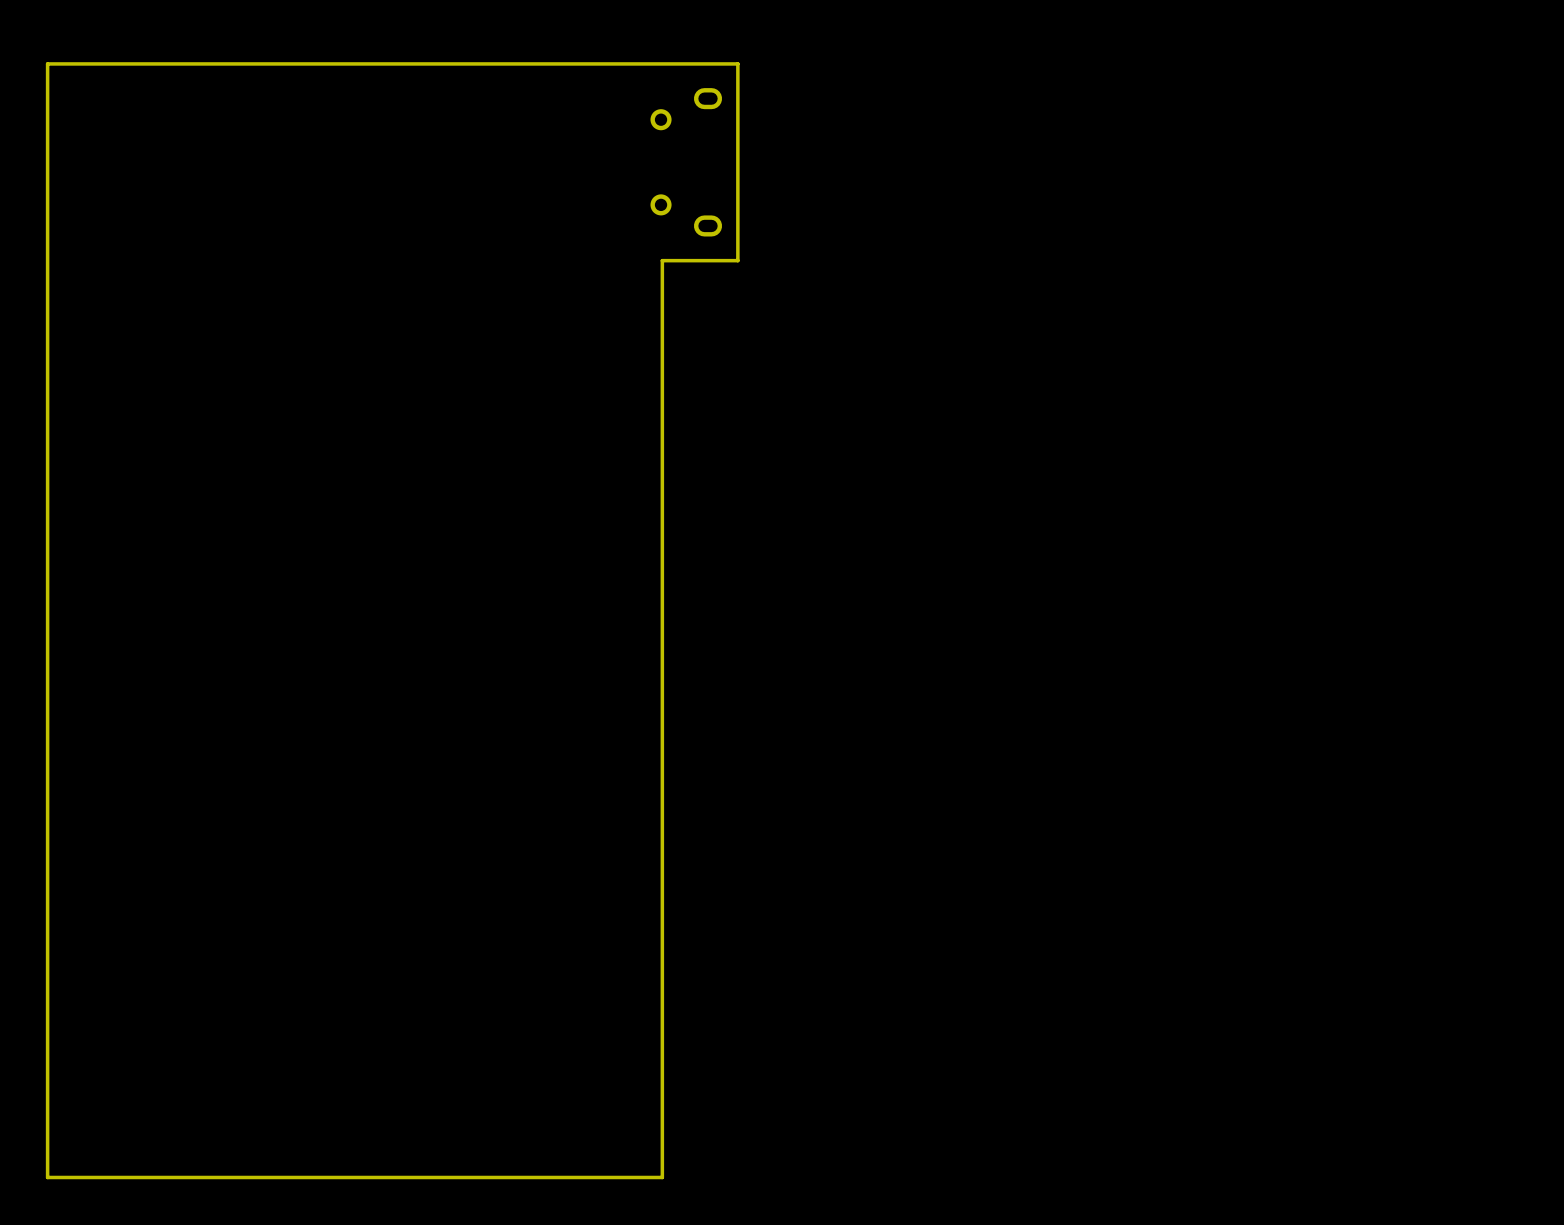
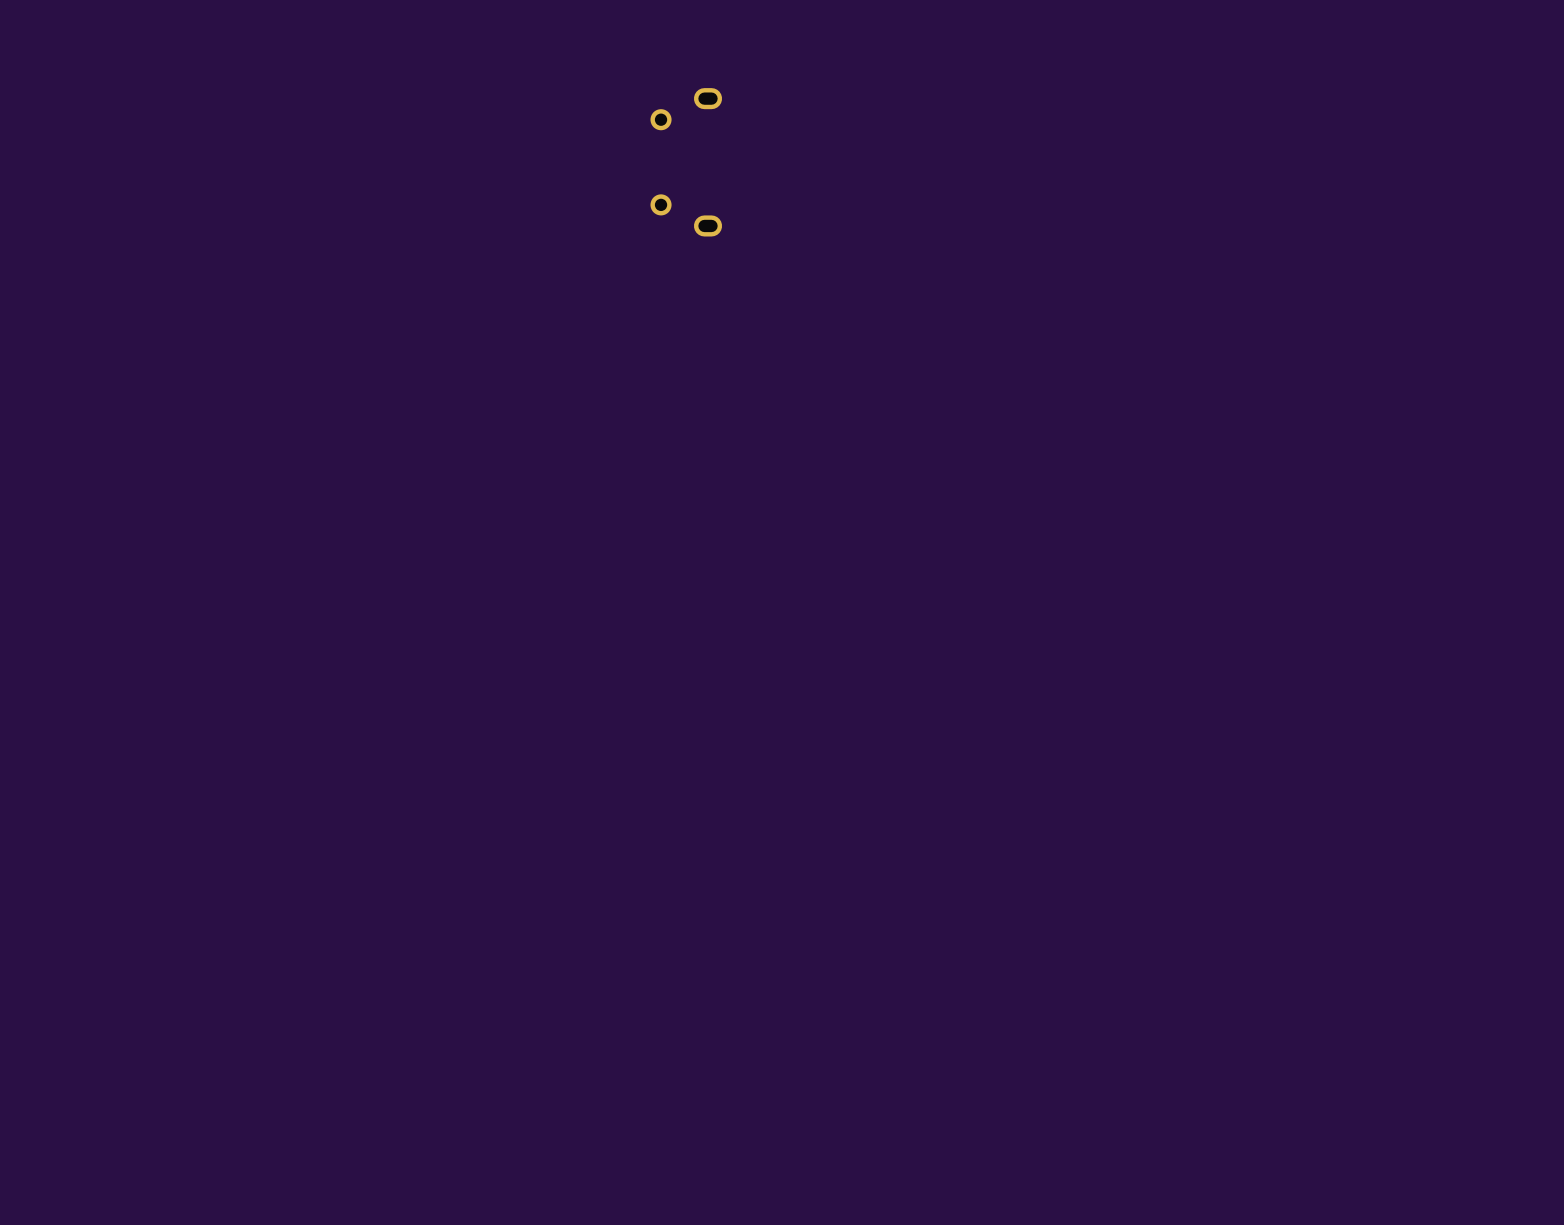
board edge: (737, 63) (47, 63) (47, 1177) (662, 1177) (662, 260) (737, 260) (737, 63) -> none

